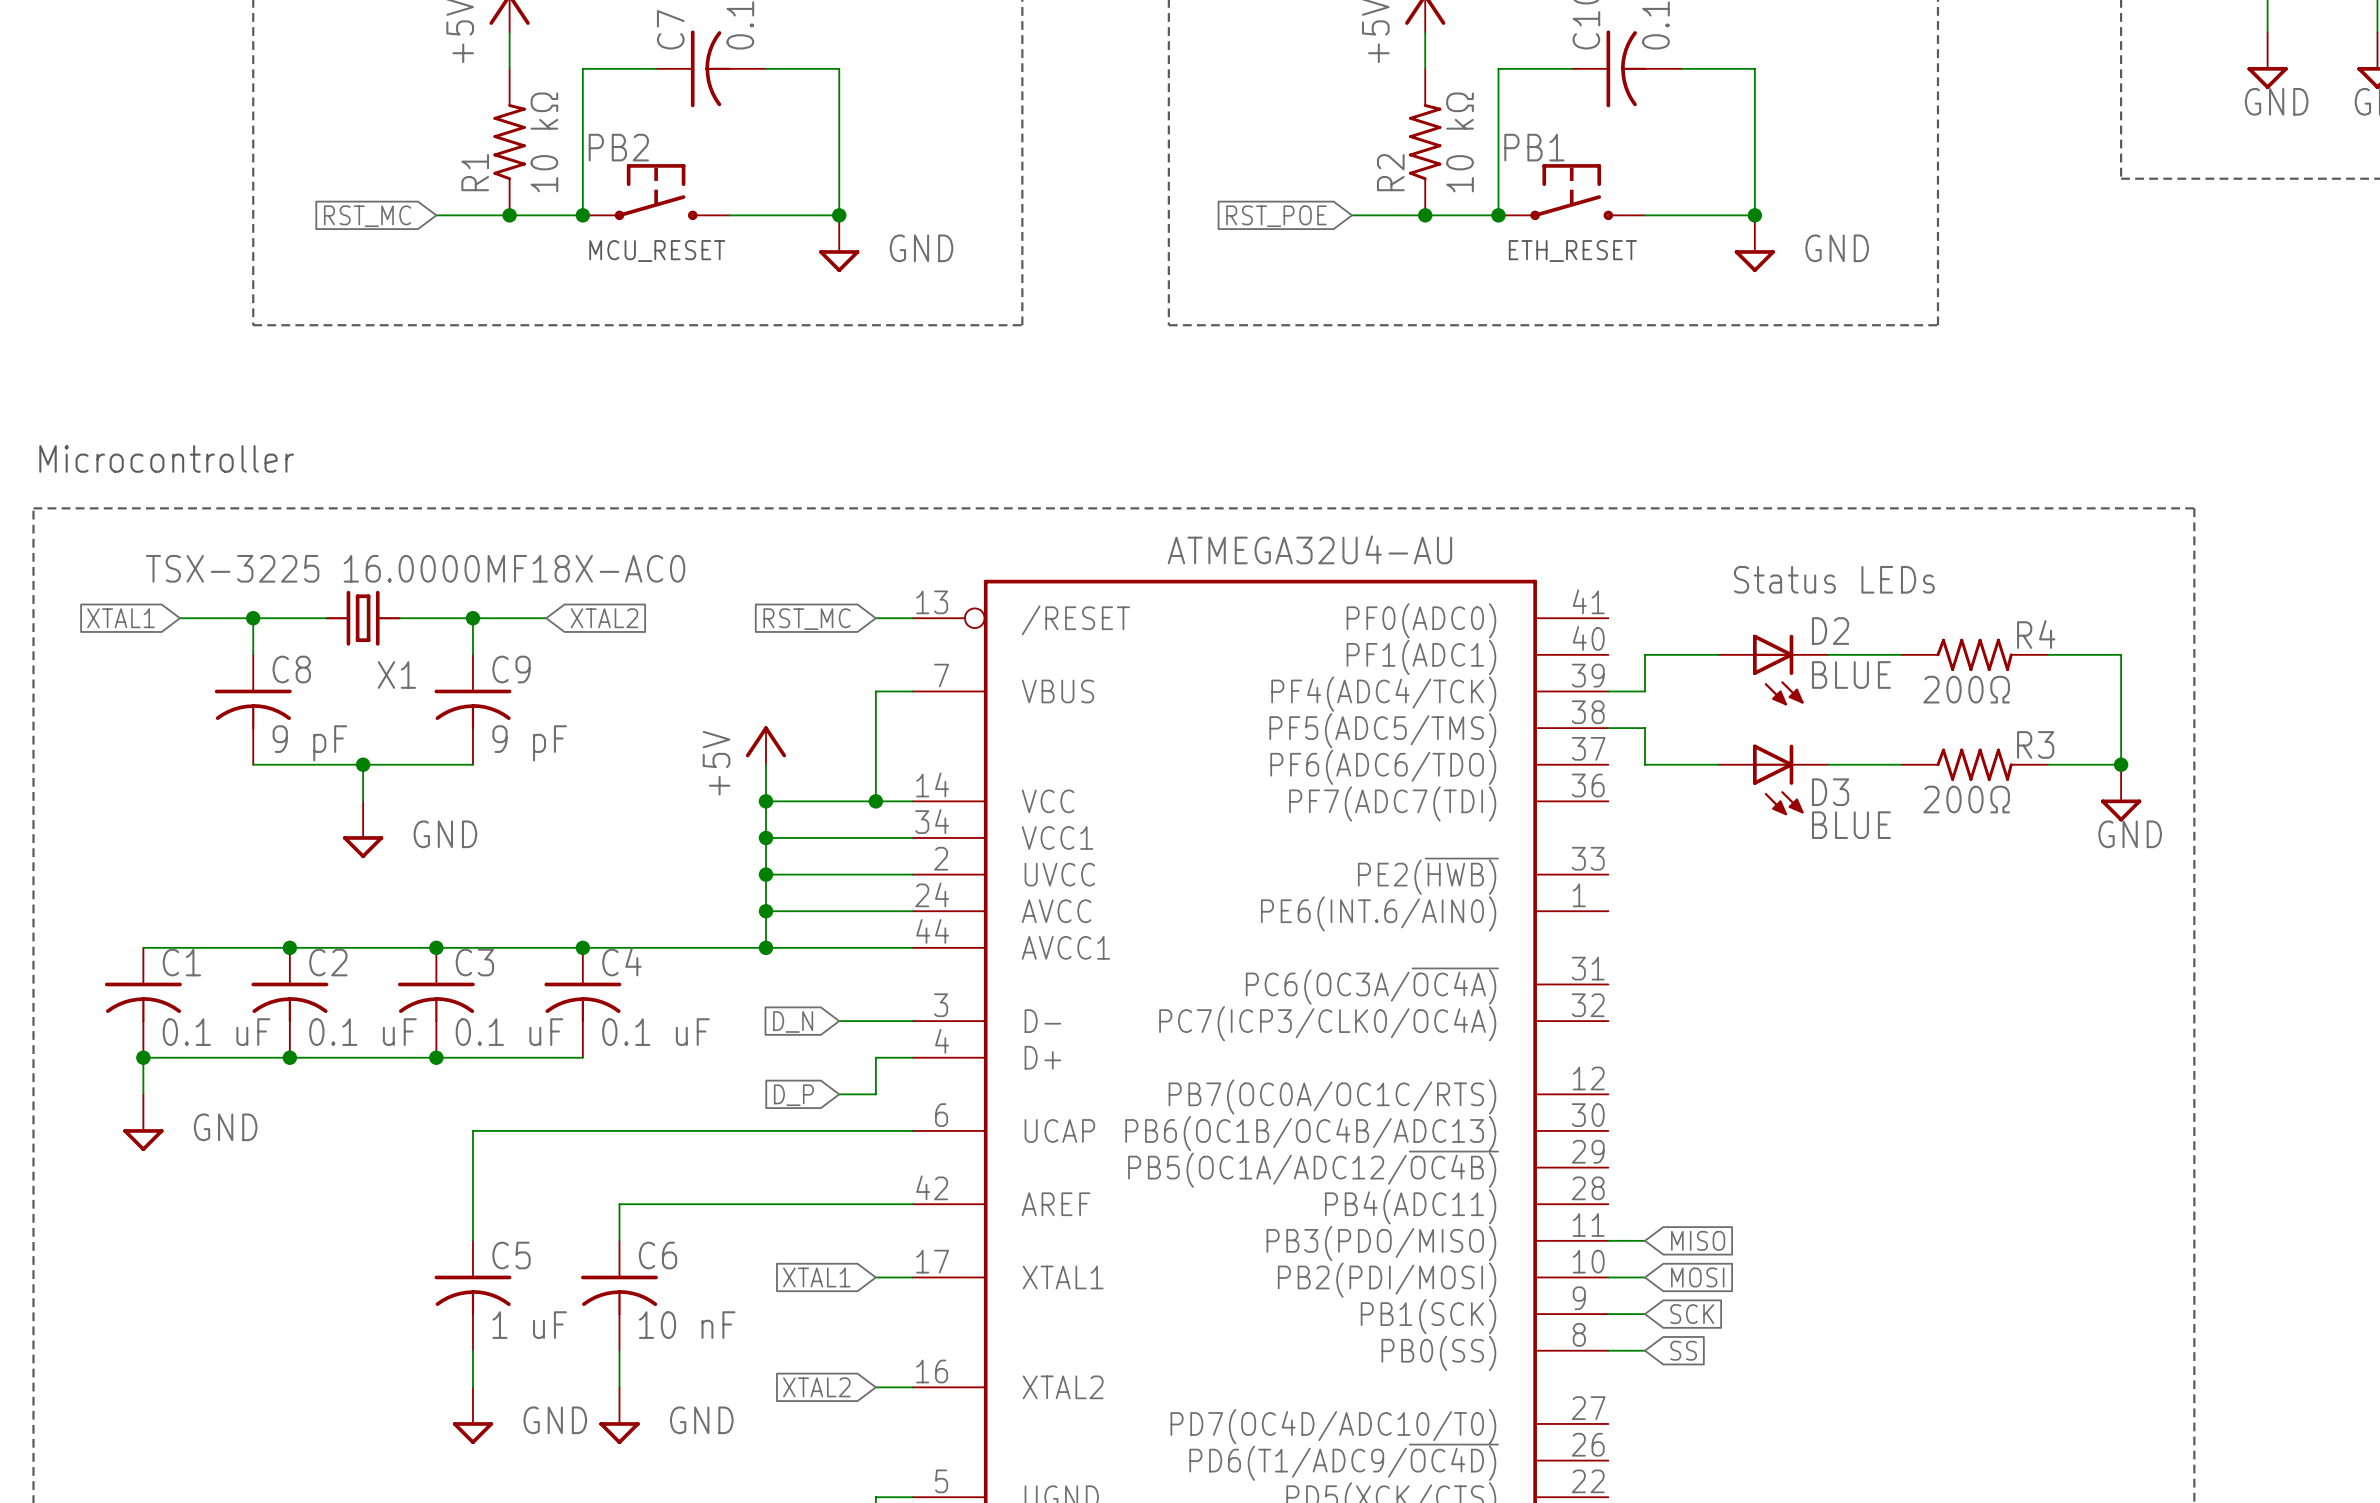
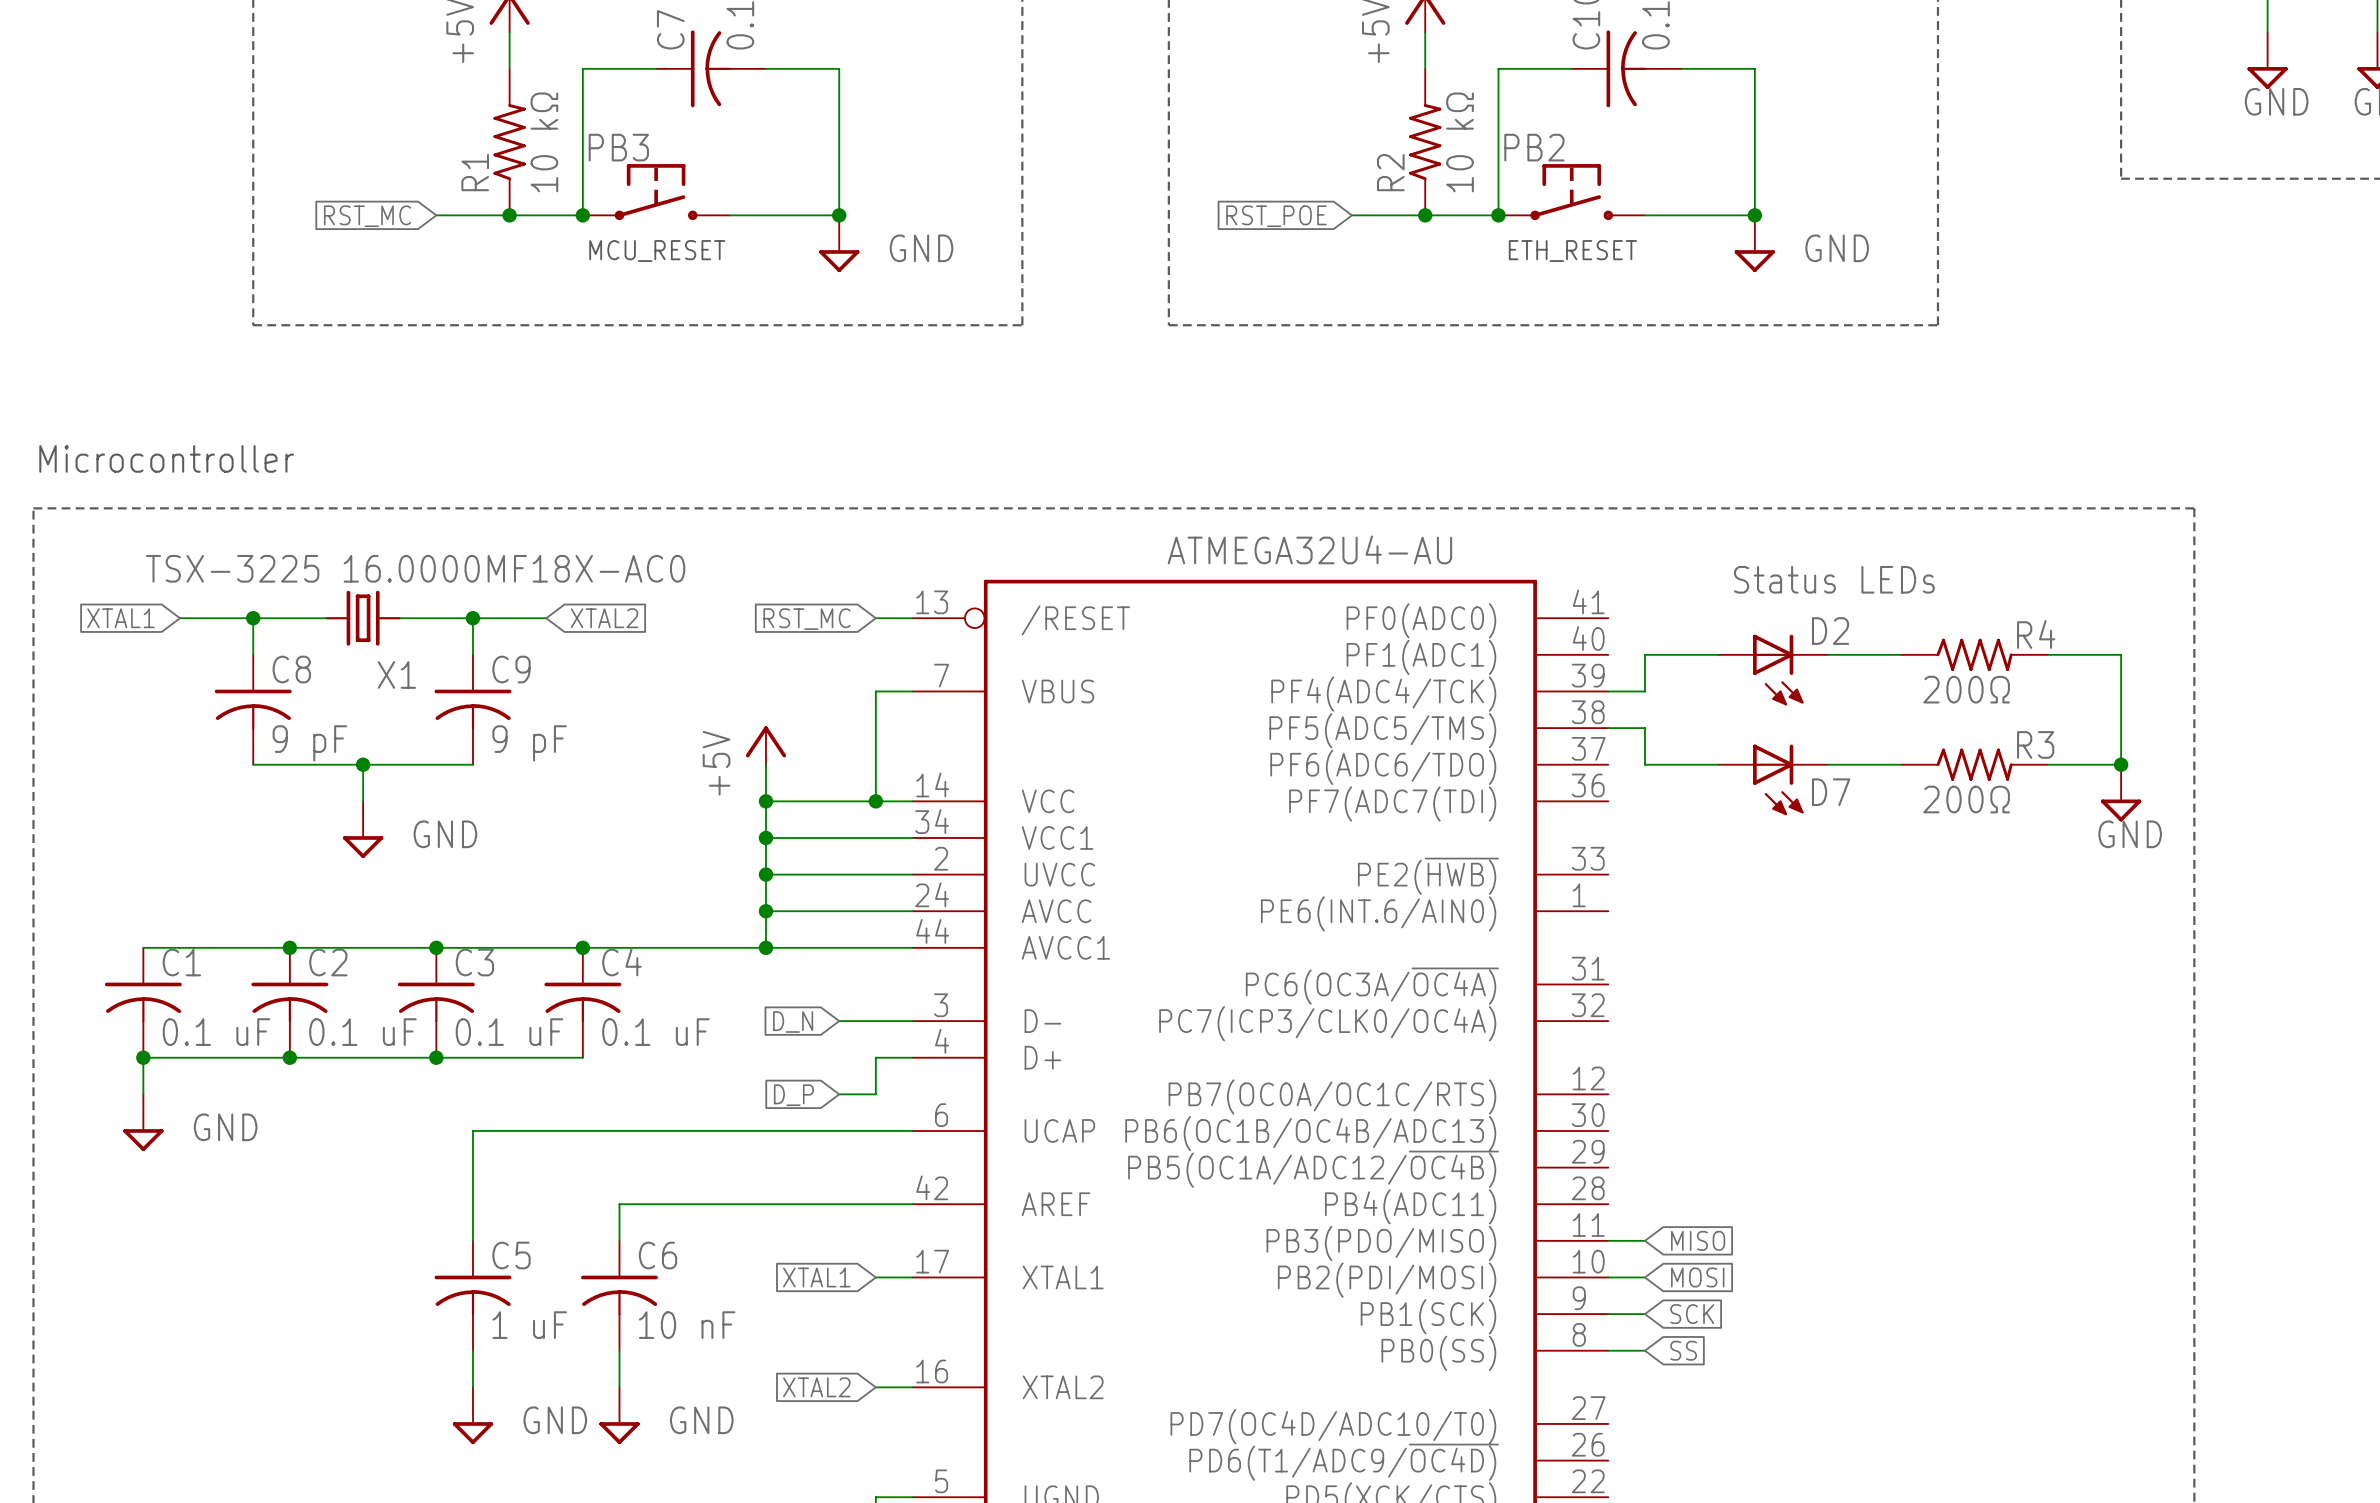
PB2 name: PB2 (618, 147) -> PB3 (618, 147)
PB1 name: PB1 (1534, 147) -> PB2 (1534, 147)
text: BLUE (1851, 675) -> none
D3 name: D3 (1830, 792) -> D7 (1831, 792)
text: BLUE (1851, 825) -> none

